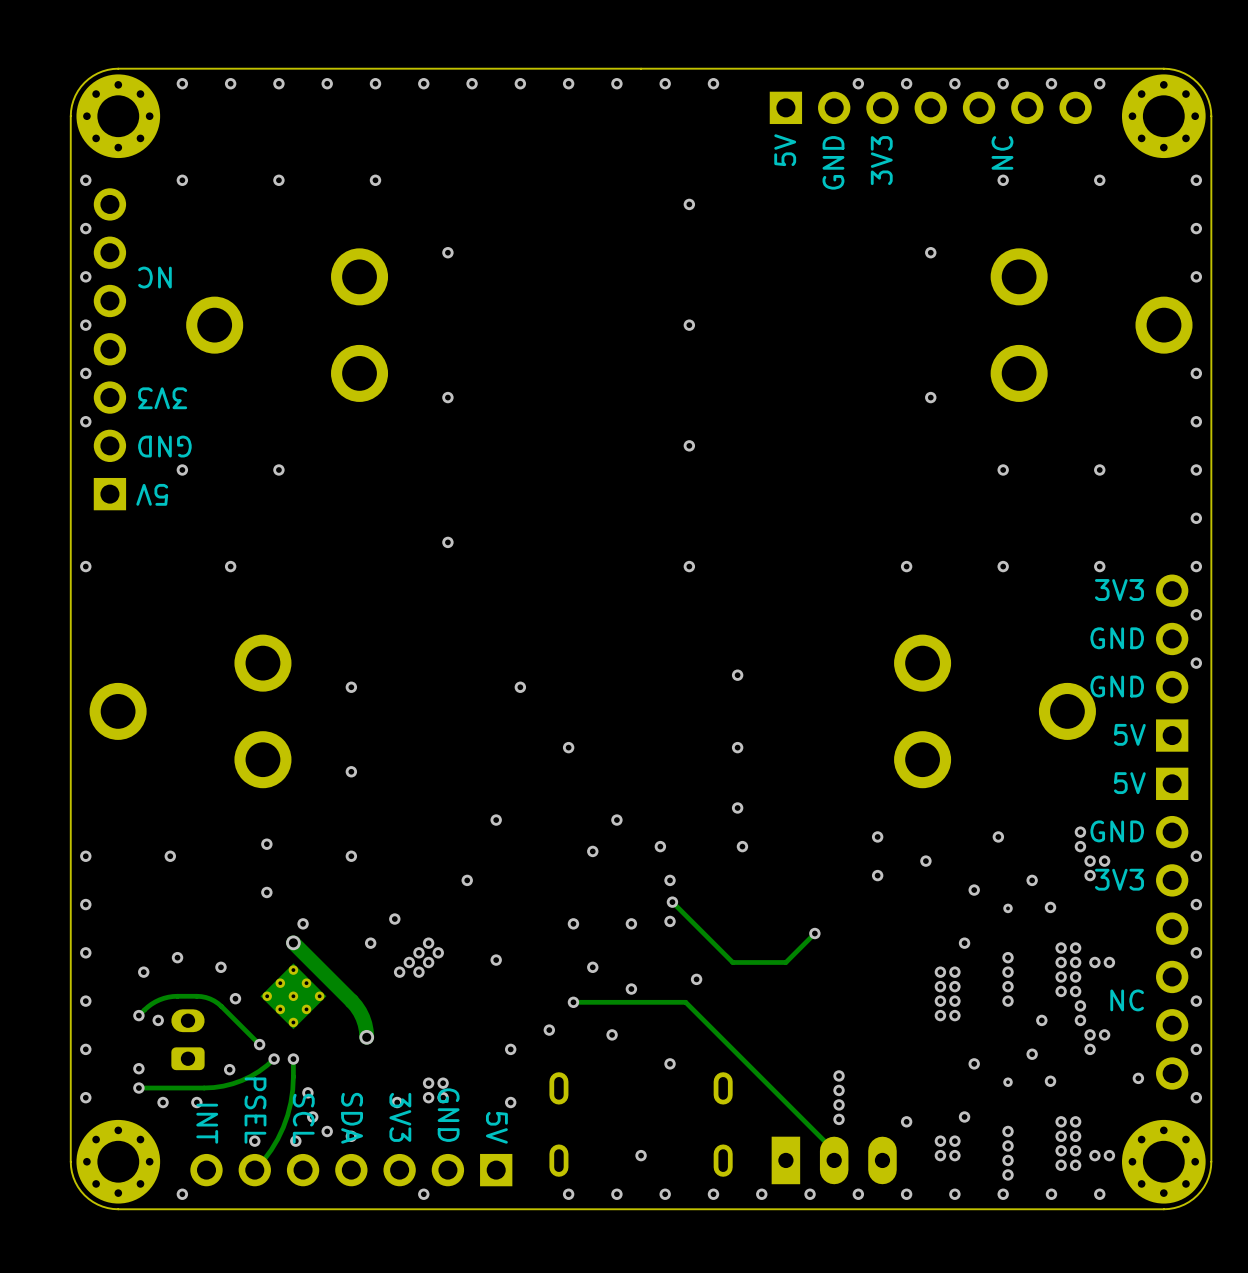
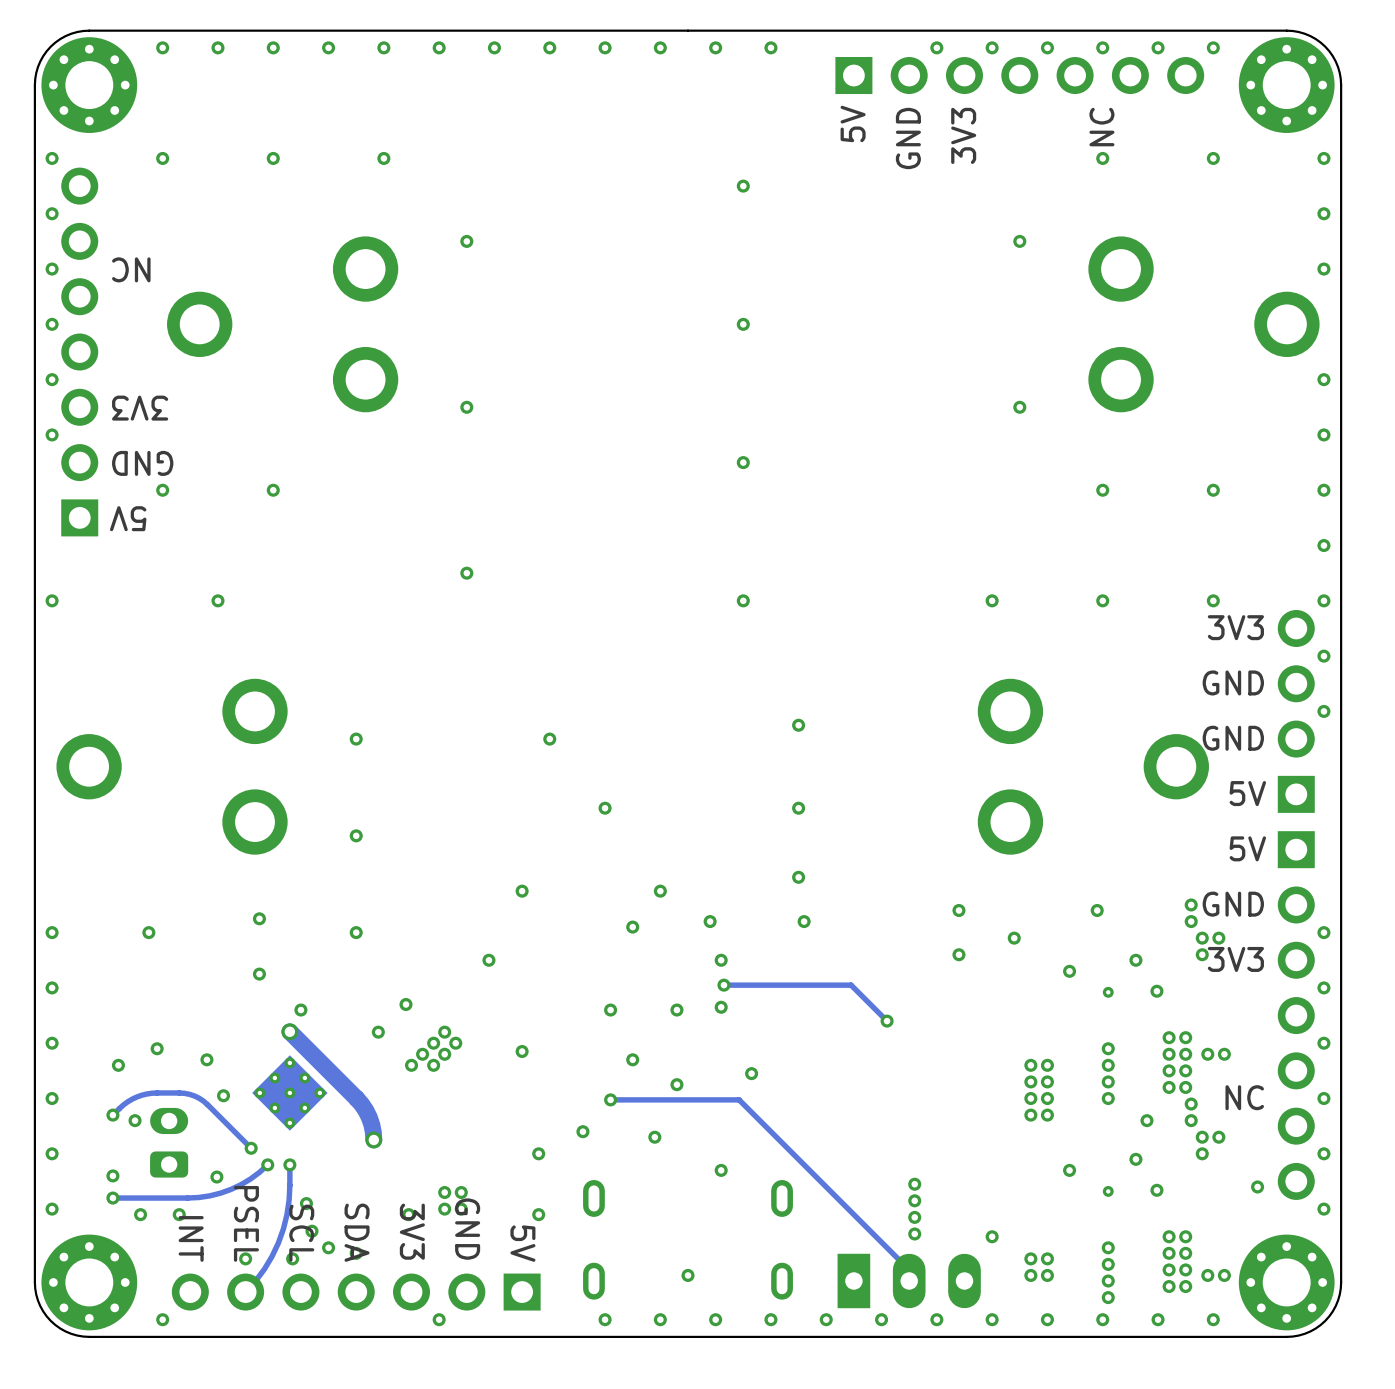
track: (672, 902) (732, 962) (785, 962) (814, 933) -> (723, 985) (851, 985) (887, 1021)
via: (964, 943) -> none
via: (964, 1116) -> none

